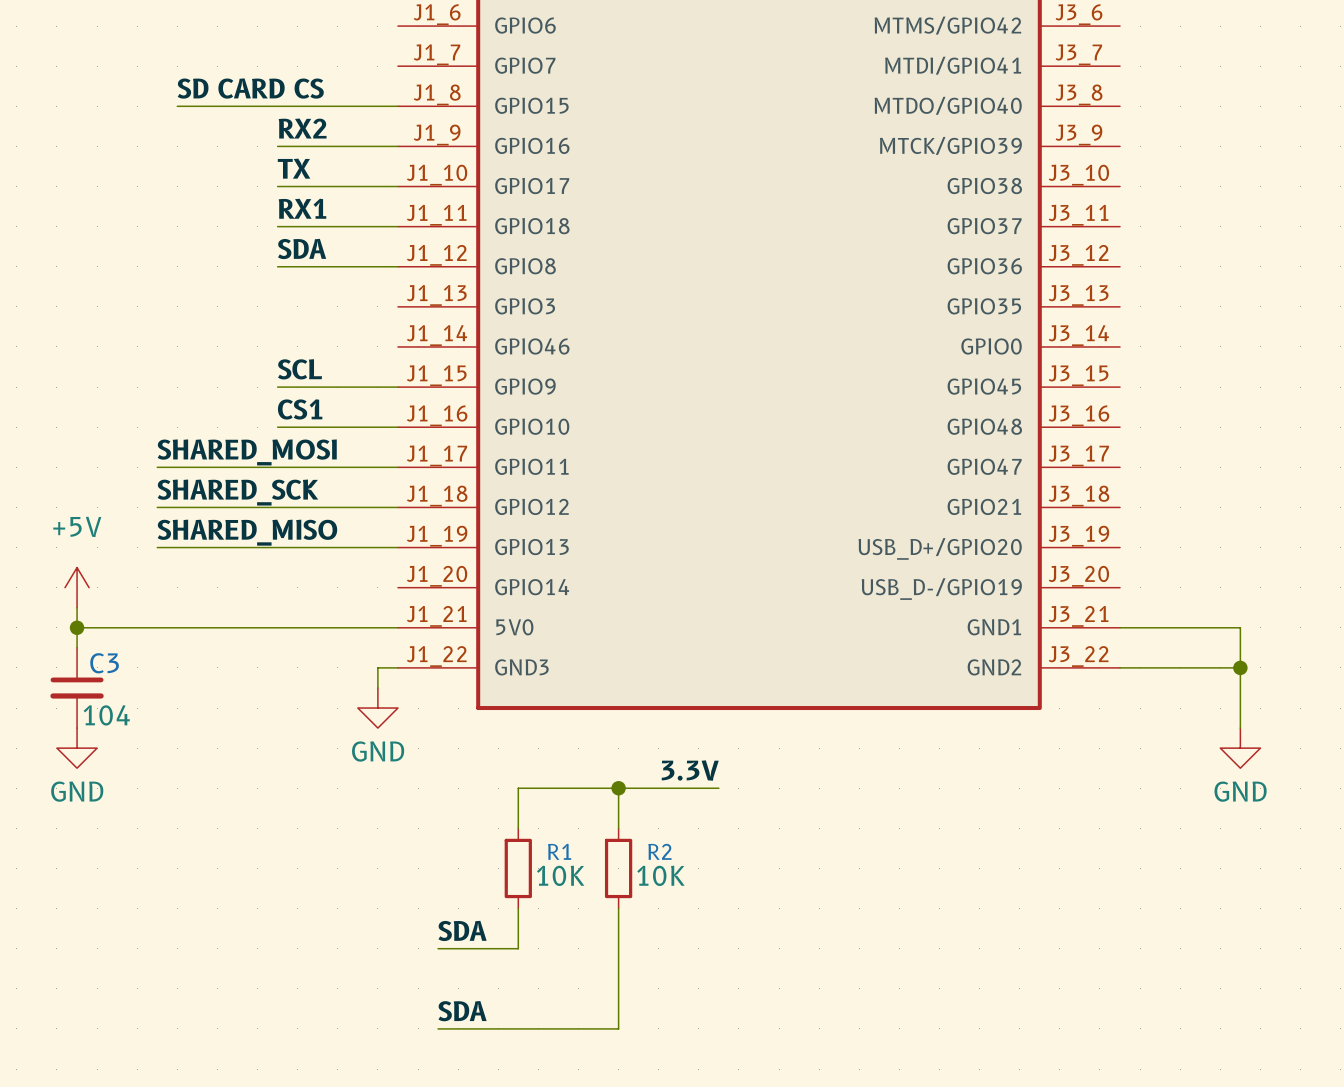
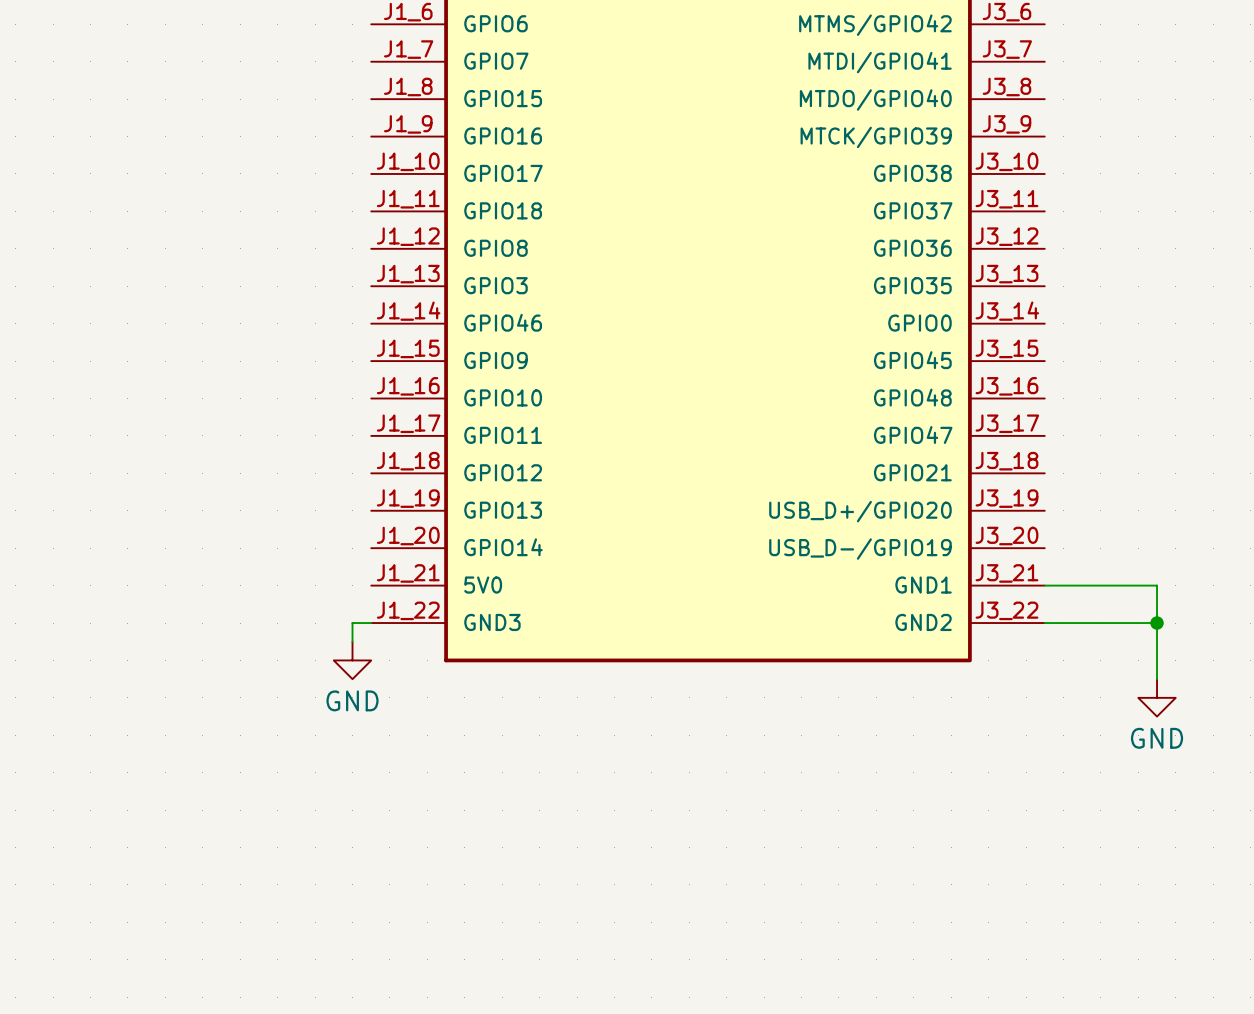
label: SD CARD CS (250, 88) -> none
wire: (177, 106) (397, 106) -> none
label: RX2 (302, 128) -> none
wire: (277, 146) (397, 146) -> none
label: TX (294, 168) -> none
wire: (277, 186) (397, 186) -> none
label: RX1 (302, 208) -> none
wire: (277, 226) (397, 226) -> none
label: SDA (302, 248) -> none
wire: (277, 266) (397, 266) -> none
label: SCL (300, 369) -> none
wire: (277, 387) (397, 387) -> none
label: CS1 (300, 409) -> none
wire: (277, 427) (397, 427) -> none
label: SHARED_MOSI (247, 452) -> none
wire: (157, 467) (397, 467) -> none
label: SHARED_SCK (237, 492) -> none
wire: (157, 507) (397, 507) -> none
label: SHARED_MISO (247, 532) -> none
wire: (157, 547) (397, 547) -> none
power symbol: +5V (77, 587) -> none
wire: (77, 607) (77, 647) -> none
wire: (77, 627) (397, 627) -> none
junction: (77, 627) -> none
C3: 104 (77, 687) -> none
power symbol: GND (77, 748) -> none
label: 3.3V (690, 770) -> none
wire: (618, 788) (618, 828) -> none
junction: (618, 788) -> none
wire: (718, 788) (518, 788) (518, 828) -> none
R1: 10K (518, 868) -> none
R2: 10K (618, 868) -> none
wire: (518, 908) (518, 948) (438, 948) -> none
wire: (618, 908) (618, 1028) (438, 1028) -> none
label: SDA (462, 930) -> none
label: SDA (462, 1011) -> none

